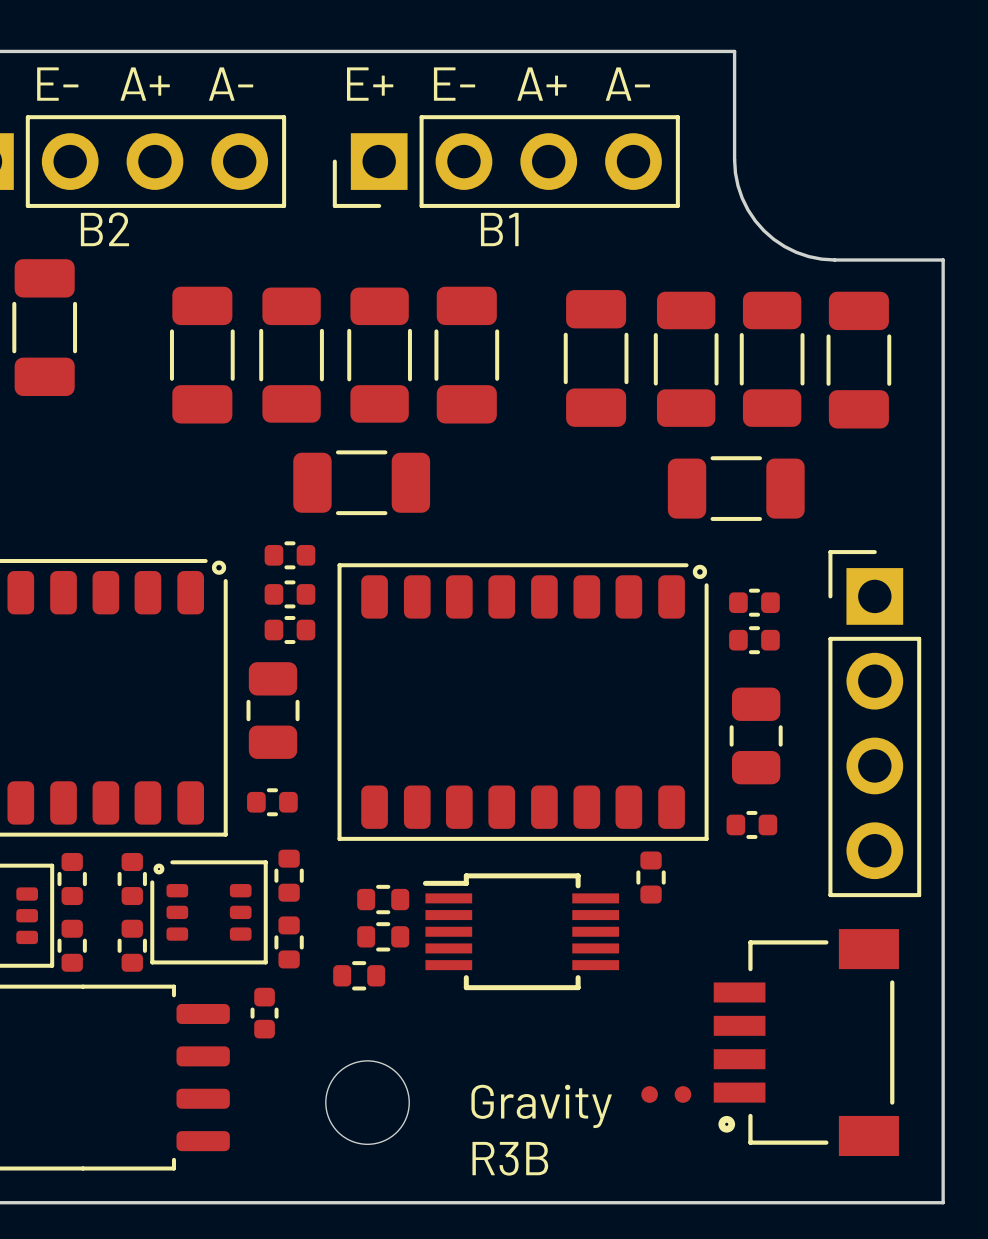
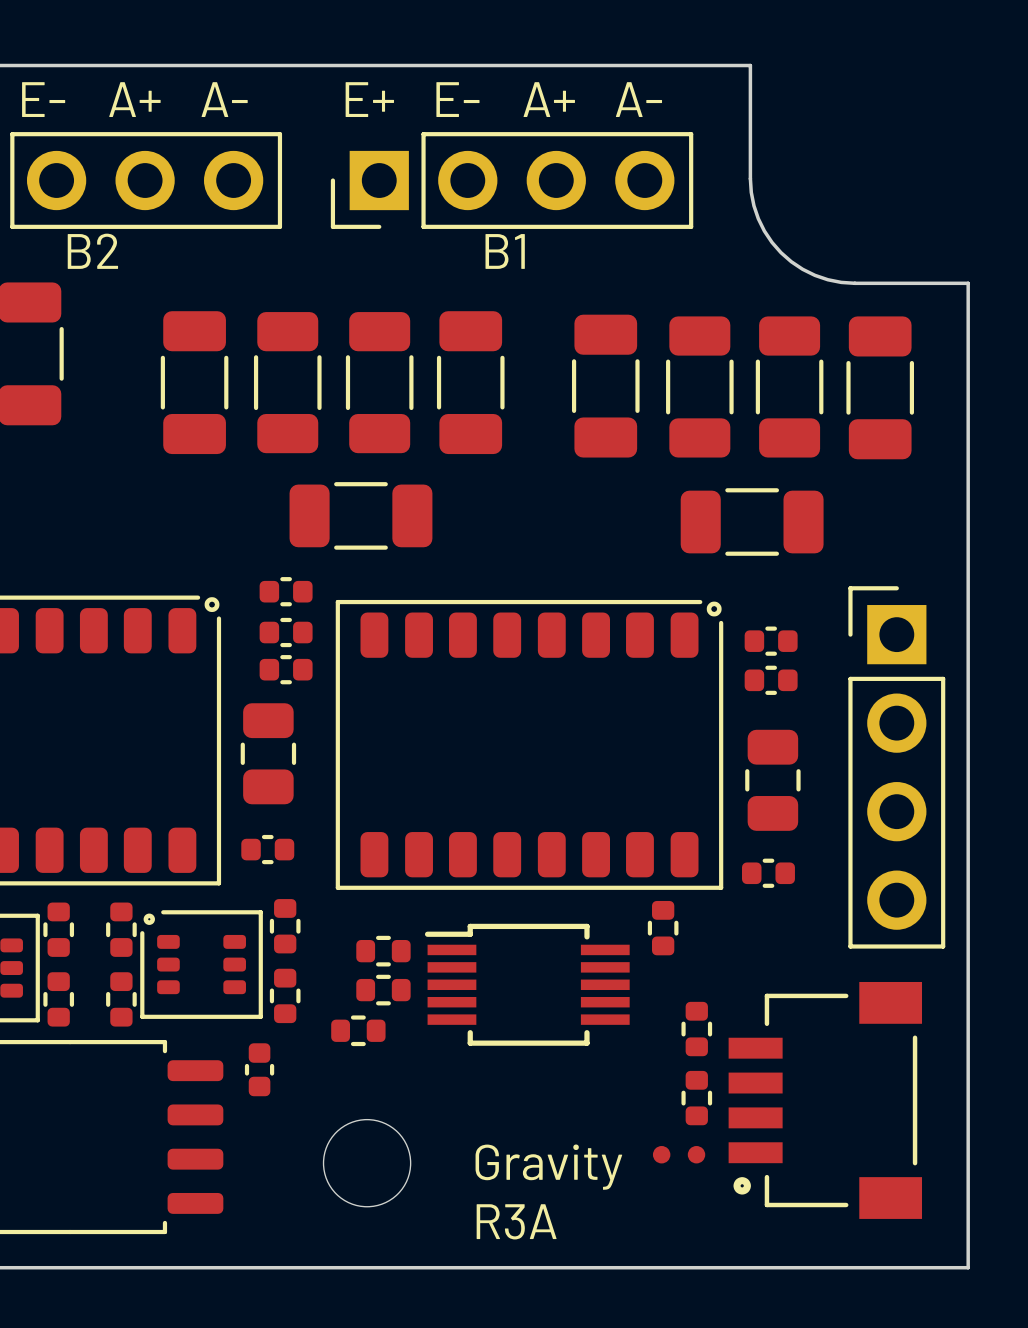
part: none -> (696, 1029)
part: none -> (696, 1098)
text: R3B (510, 1158) -> R3A (516, 1221)

